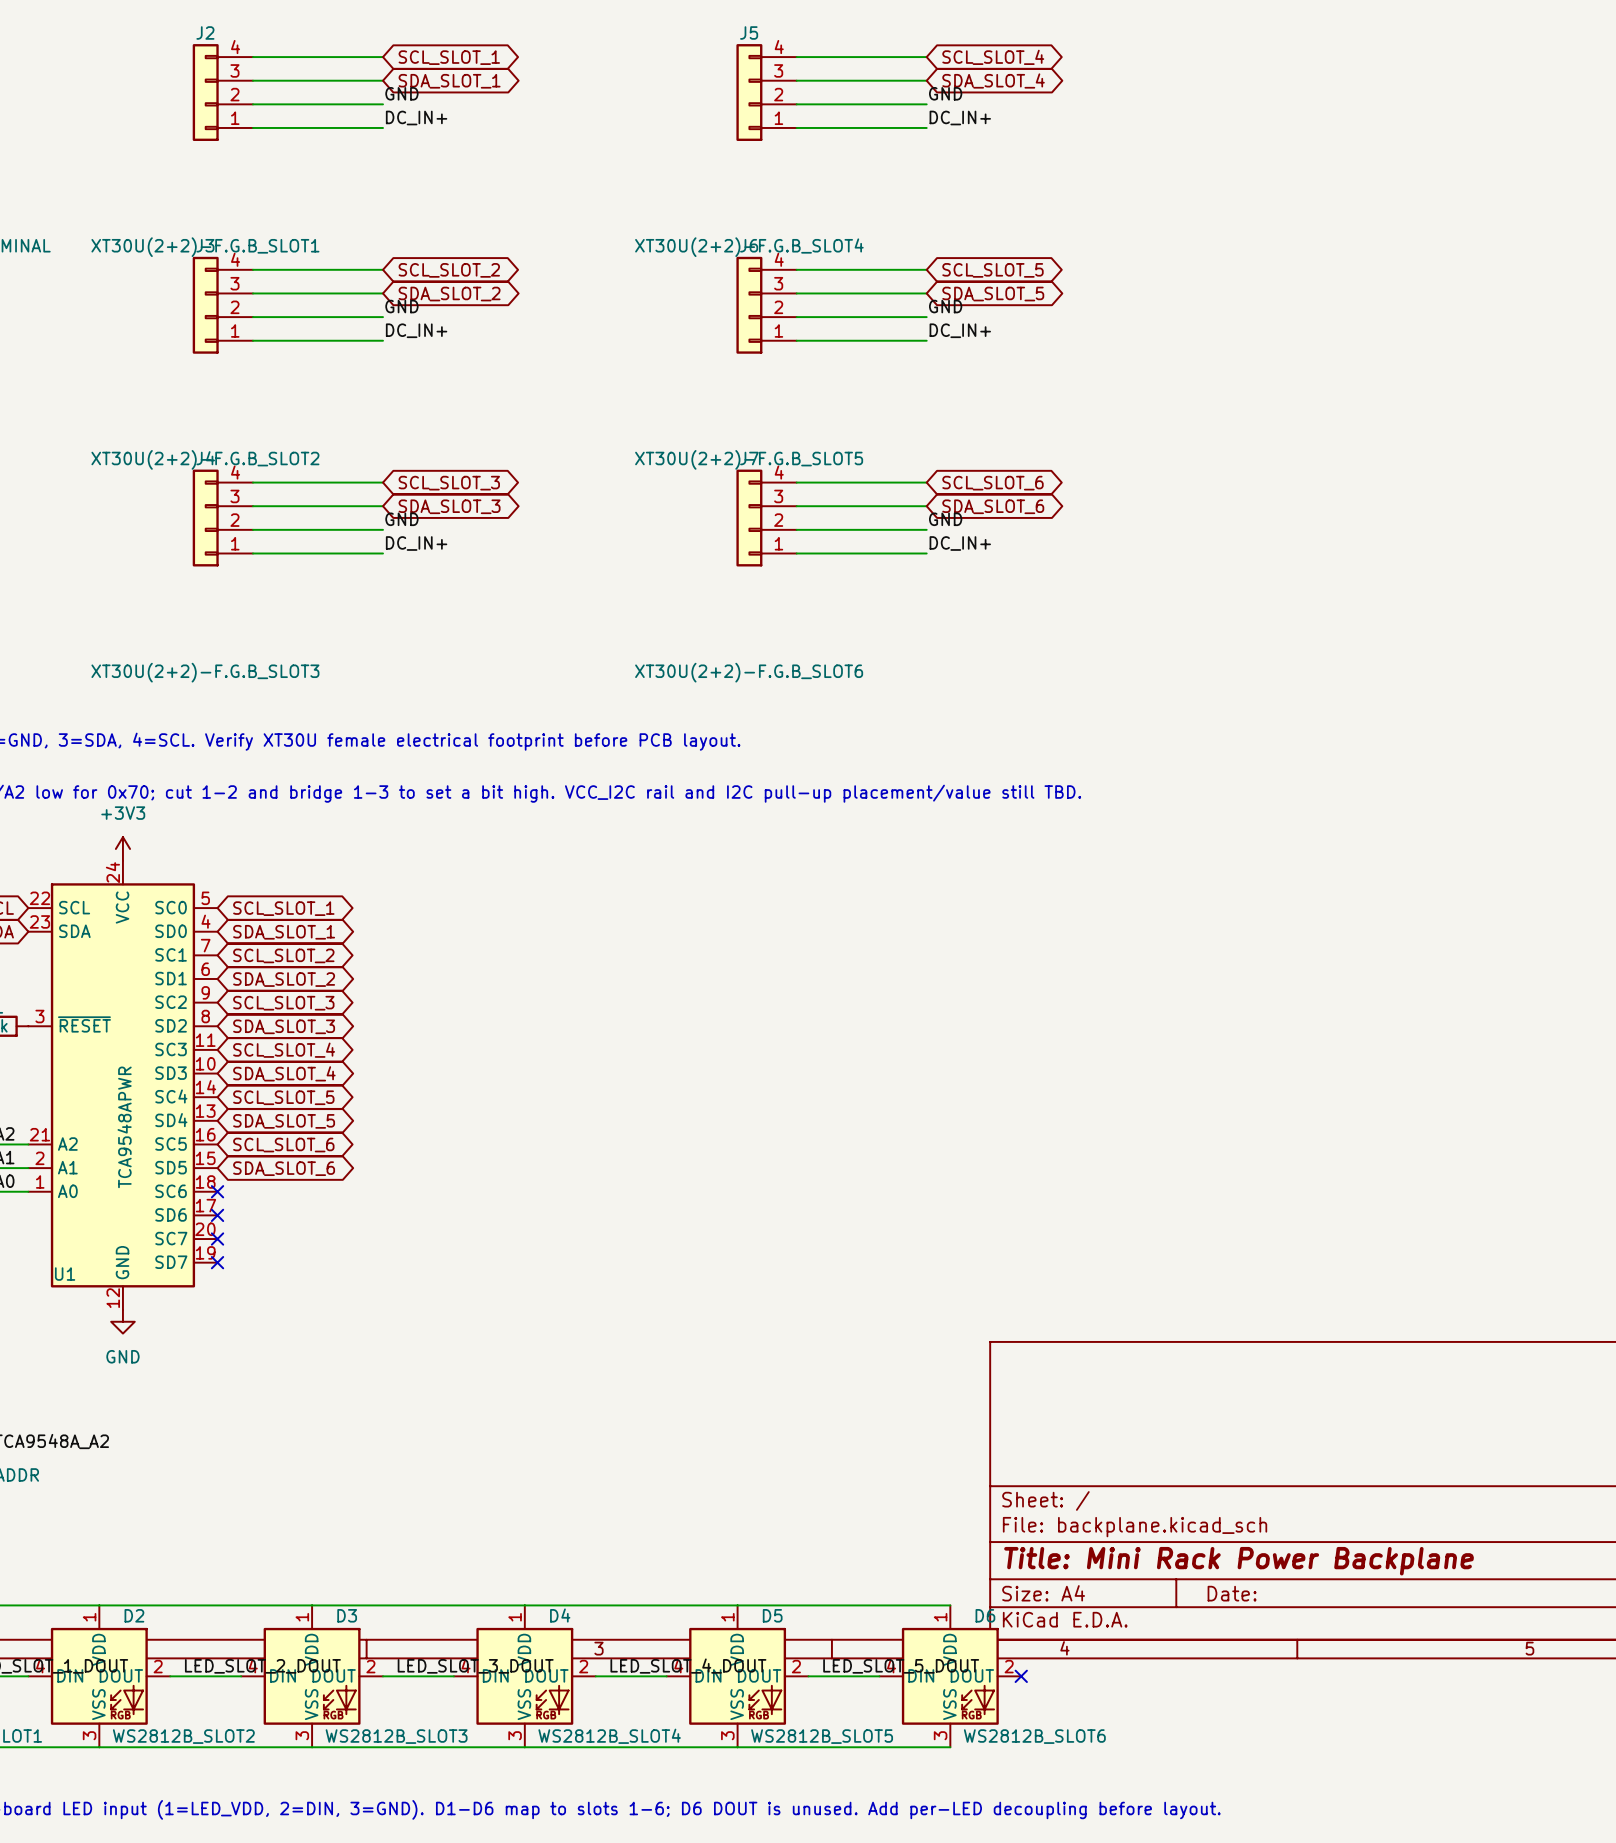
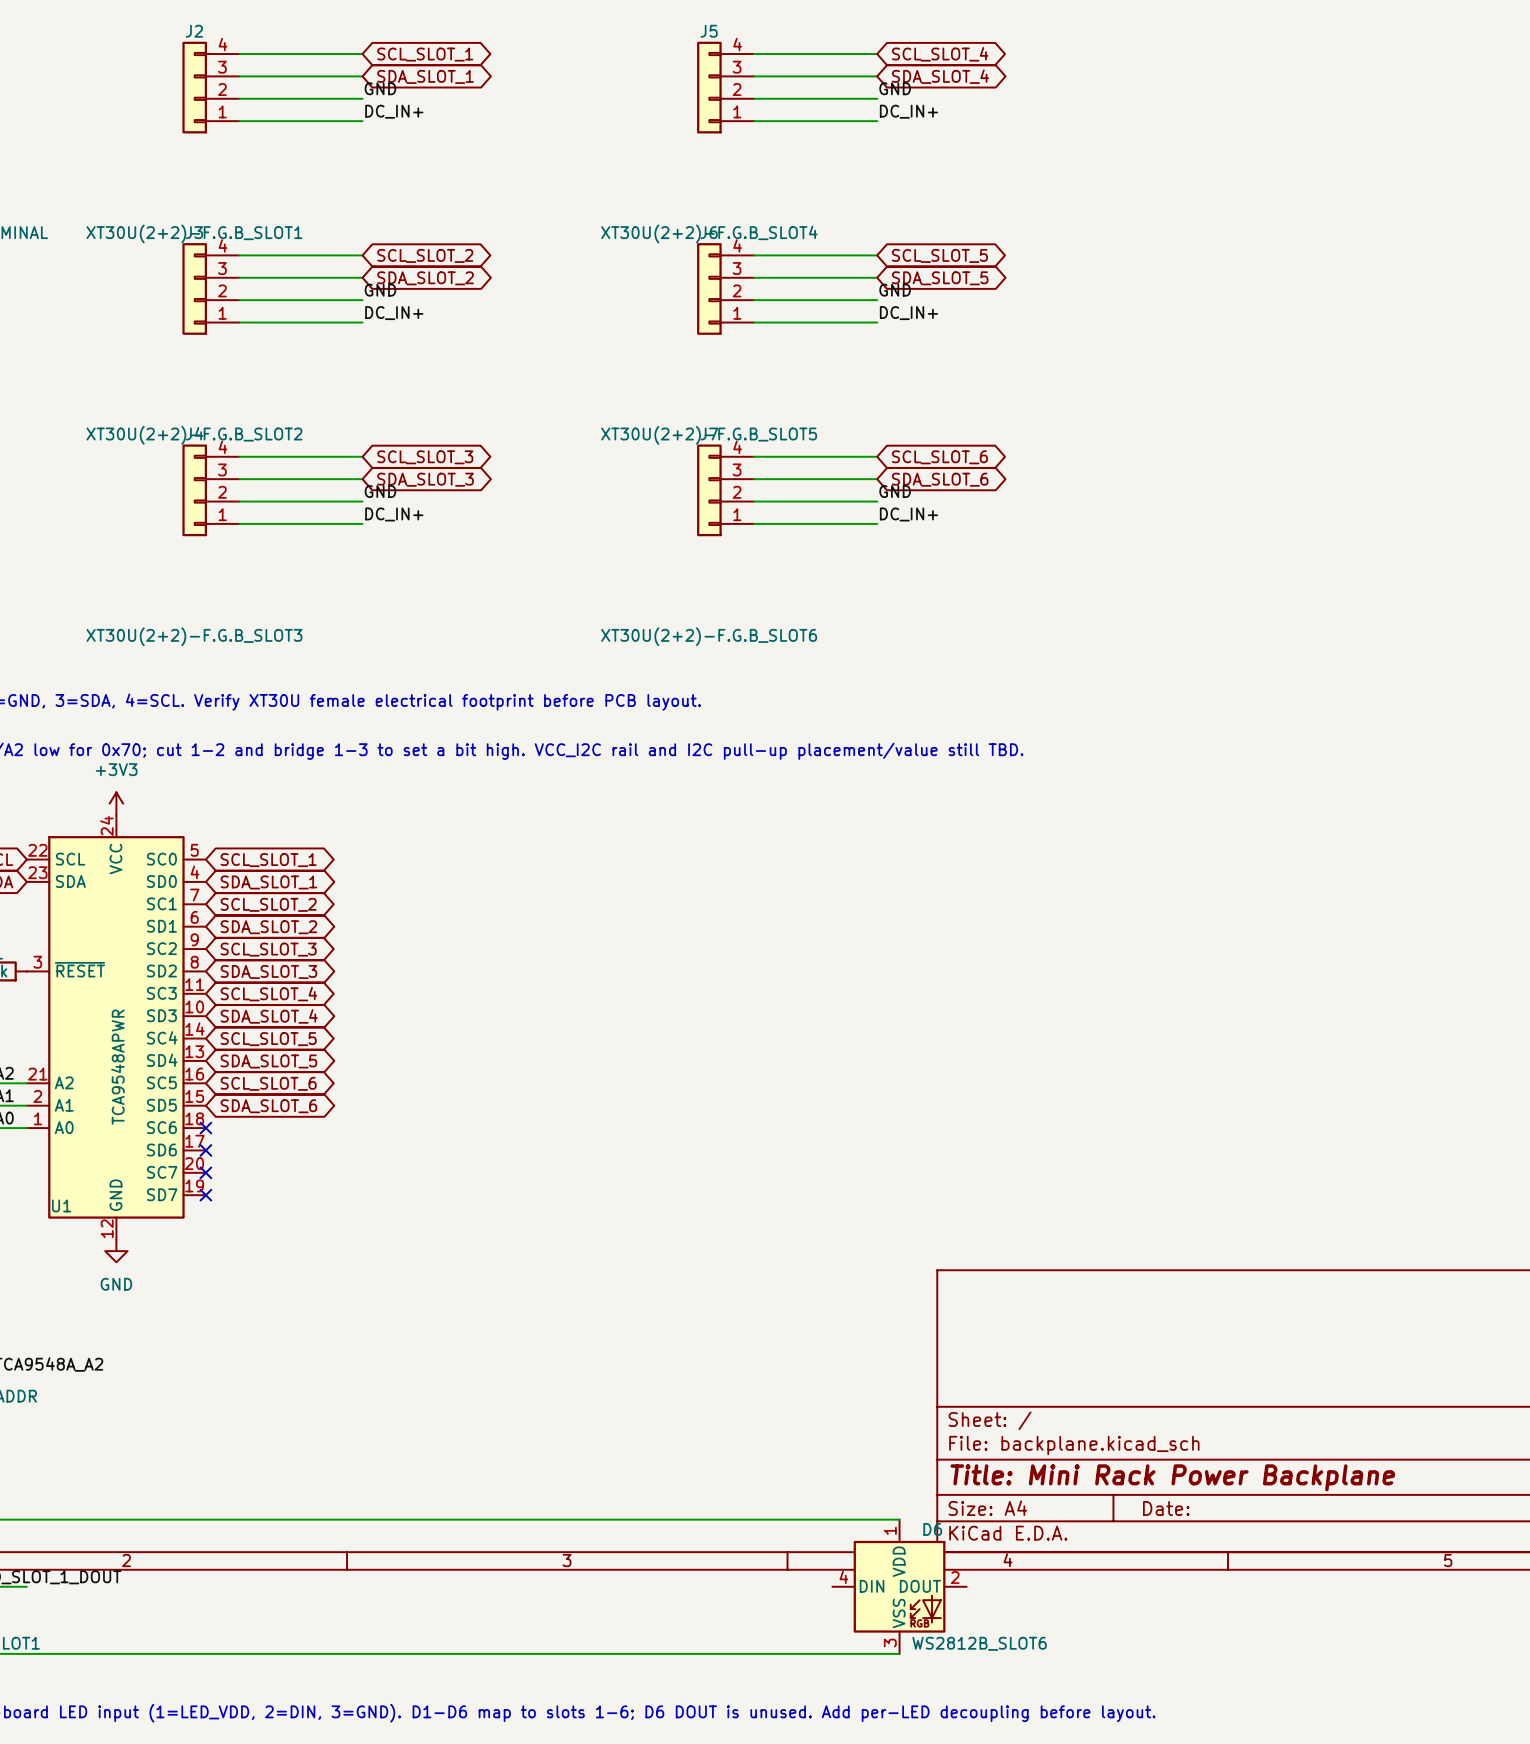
label: LED_SLOT_2_DOUT (262, 1666) -> none
label: LED_SLOT_3_DOUT (475, 1666) -> none
label: LED_SLOT_4_DOUT (688, 1666) -> none
label: LED_SLOT_5_DOUT (901, 1666) -> none
D2: WS2812B_SLOT2 (99, 1676) -> none
wire: (170, 1676) (241, 1676) -> none
D3: WS2812B_SLOT3 (312, 1676) -> none
wire: (382, 1676) (453, 1676) -> none
D4: WS2812B_SLOT4 (524, 1676) -> none
wire: (595, 1676) (666, 1676) -> none
D5: WS2812B_SLOT5 (737, 1676) -> none
wire: (808, 1676) (879, 1676) -> none
no-connect mark: (1021, 1676) -> none

